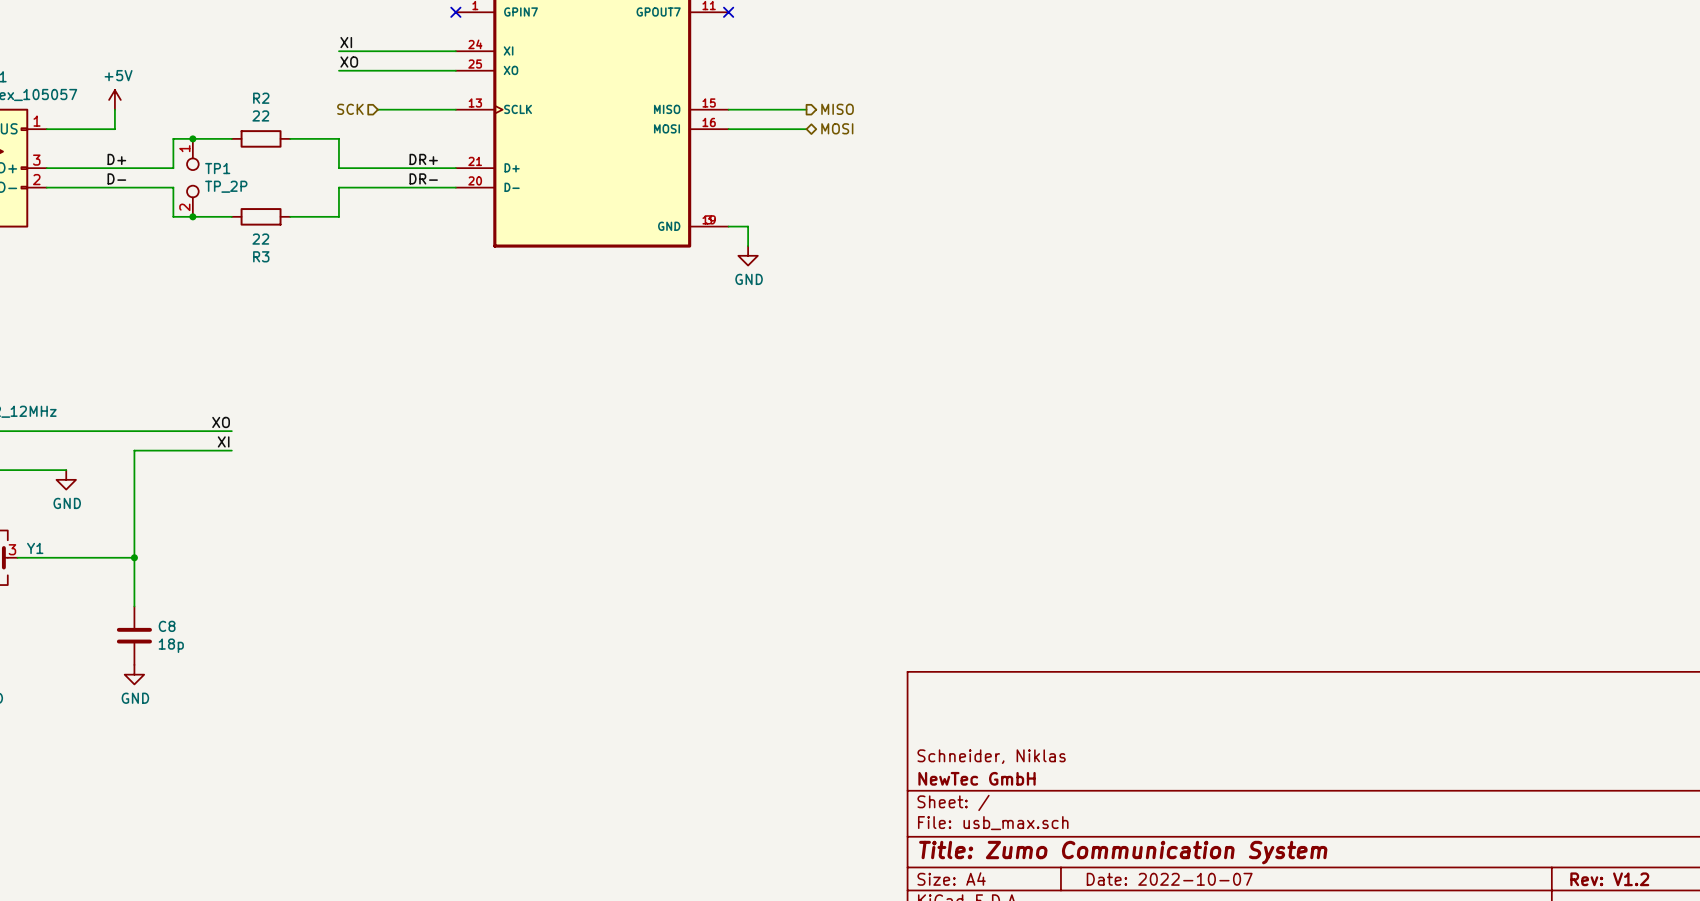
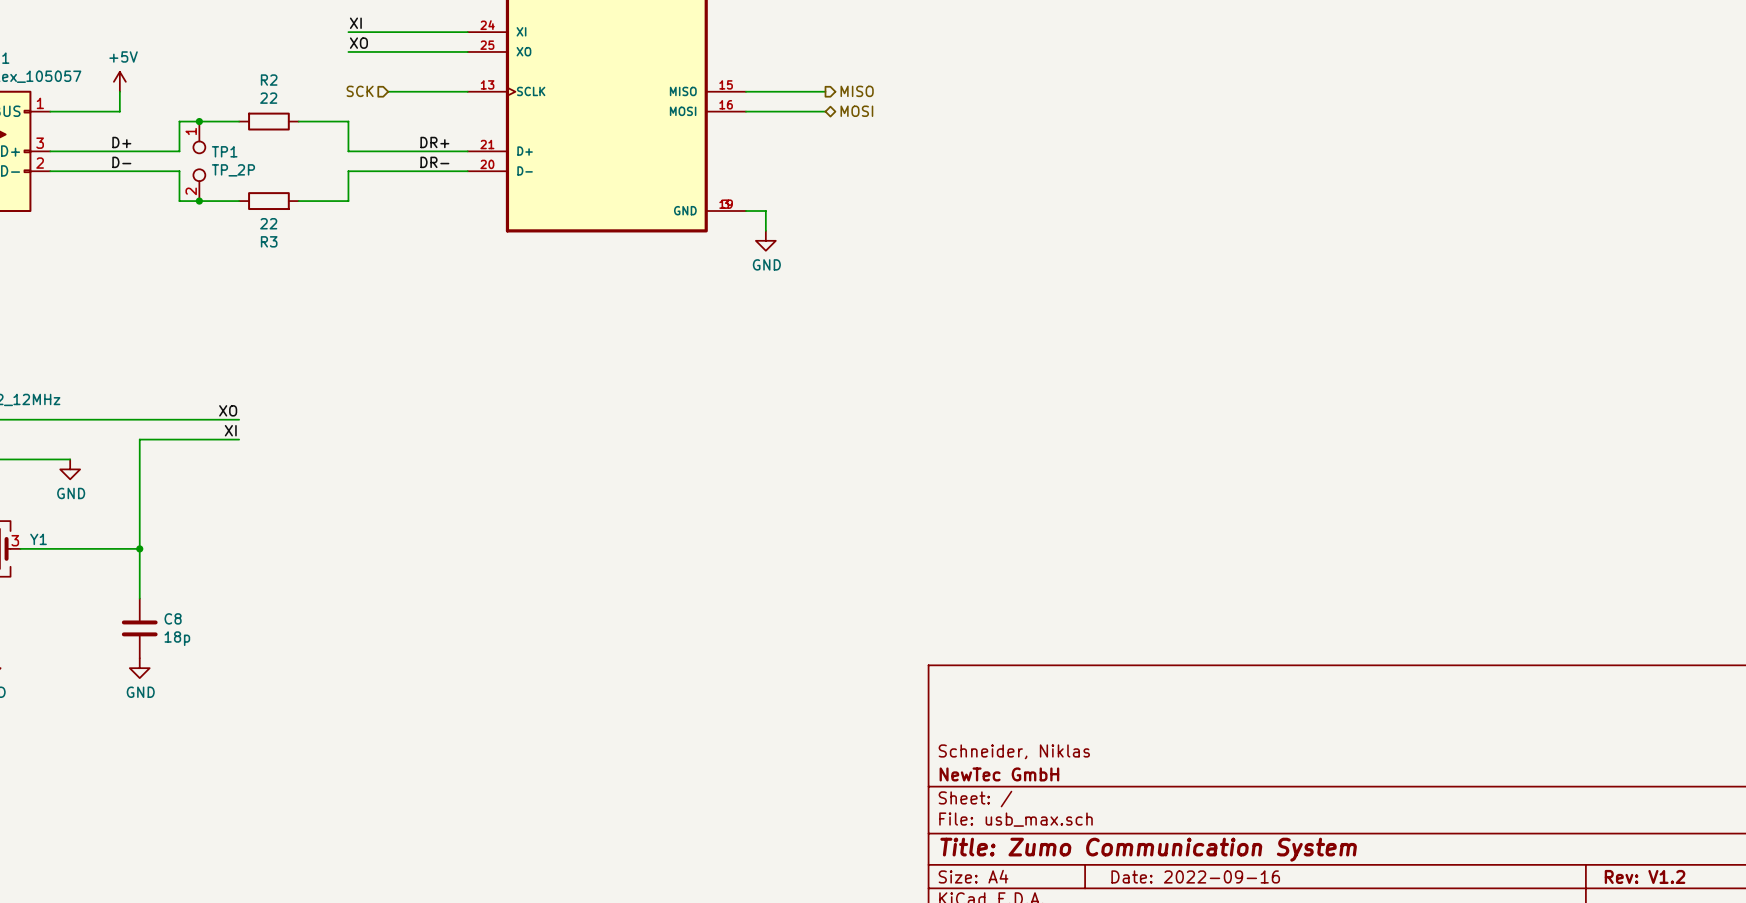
title block: Date: 2022-10-07 (1169, 879) -> Date: 2022-09-16 (1195, 876)

